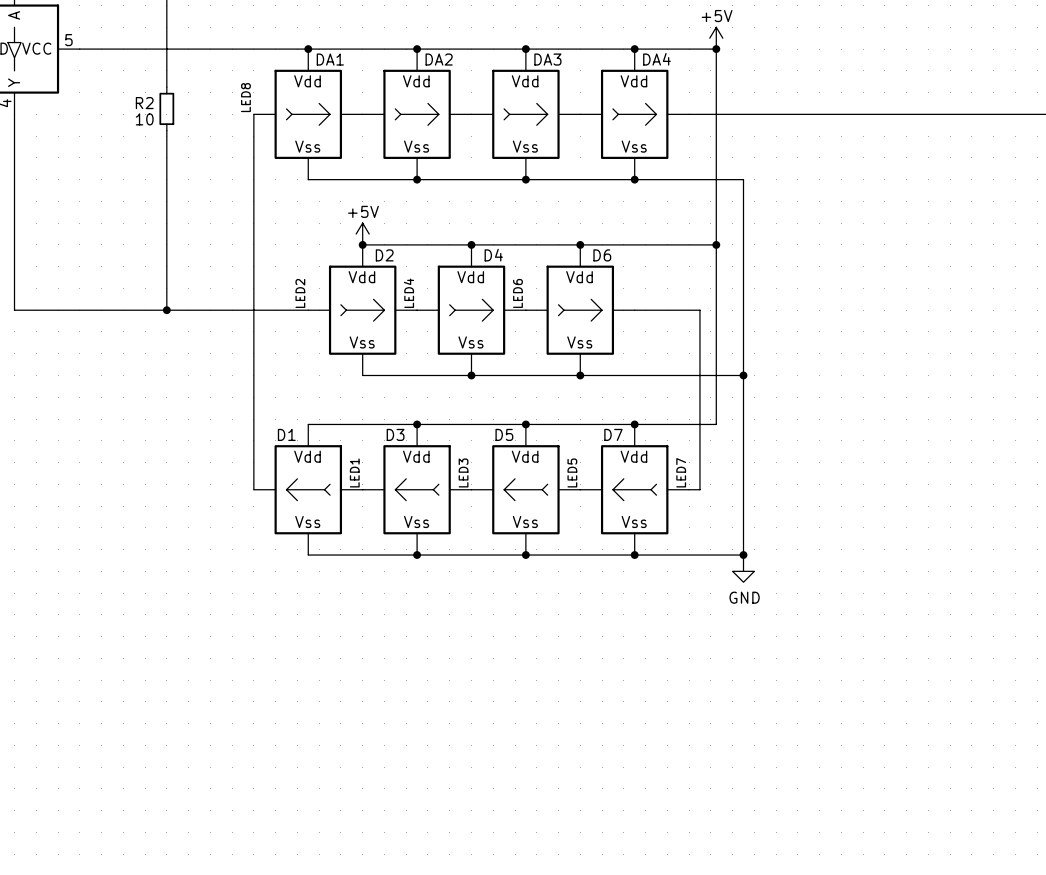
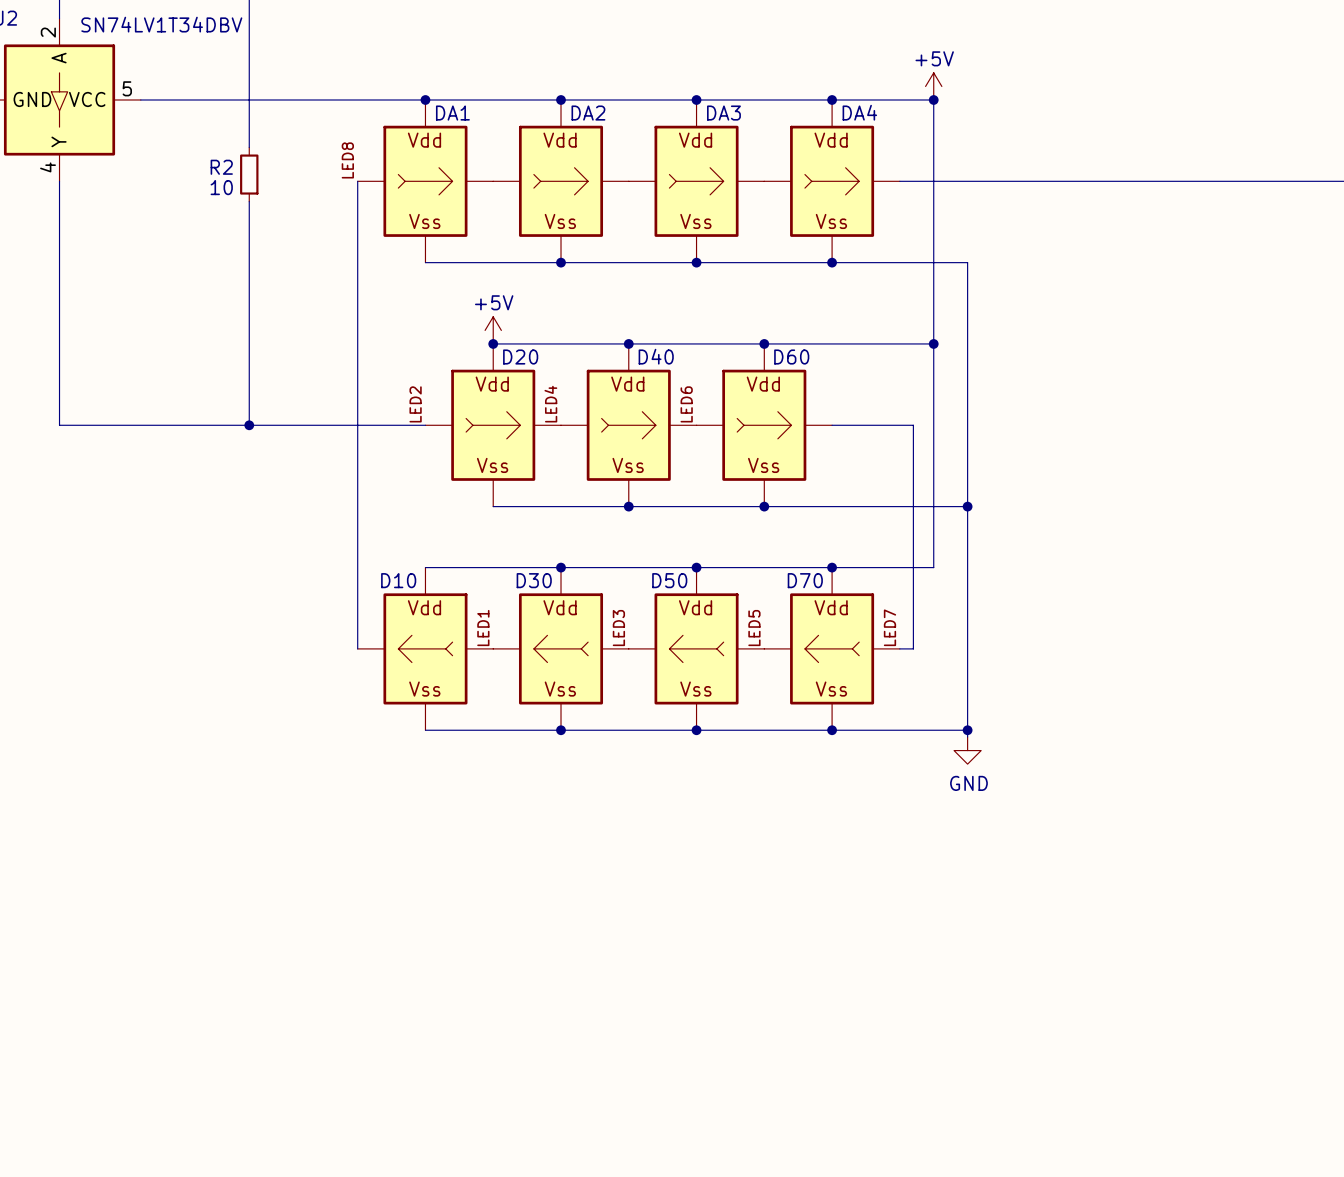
D2 name: D2 (384, 255) -> D20 (520, 357)
D4 name: D4 (493, 255) -> D40 (656, 356)
D6 name: D6 (602, 255) -> D60 (791, 357)
D1 name: D1 (286, 434) -> D10 (398, 580)
D3 name: D3 (395, 434) -> D30 (534, 580)
D5 name: D5 (504, 434) -> D50 (669, 580)
D7 name: D7 (613, 434) -> D70 (805, 580)

